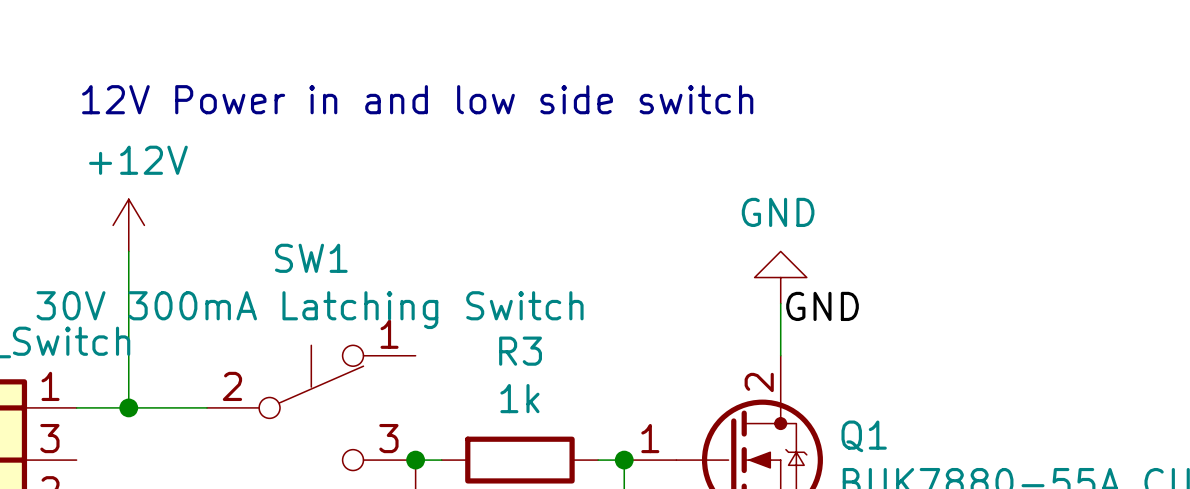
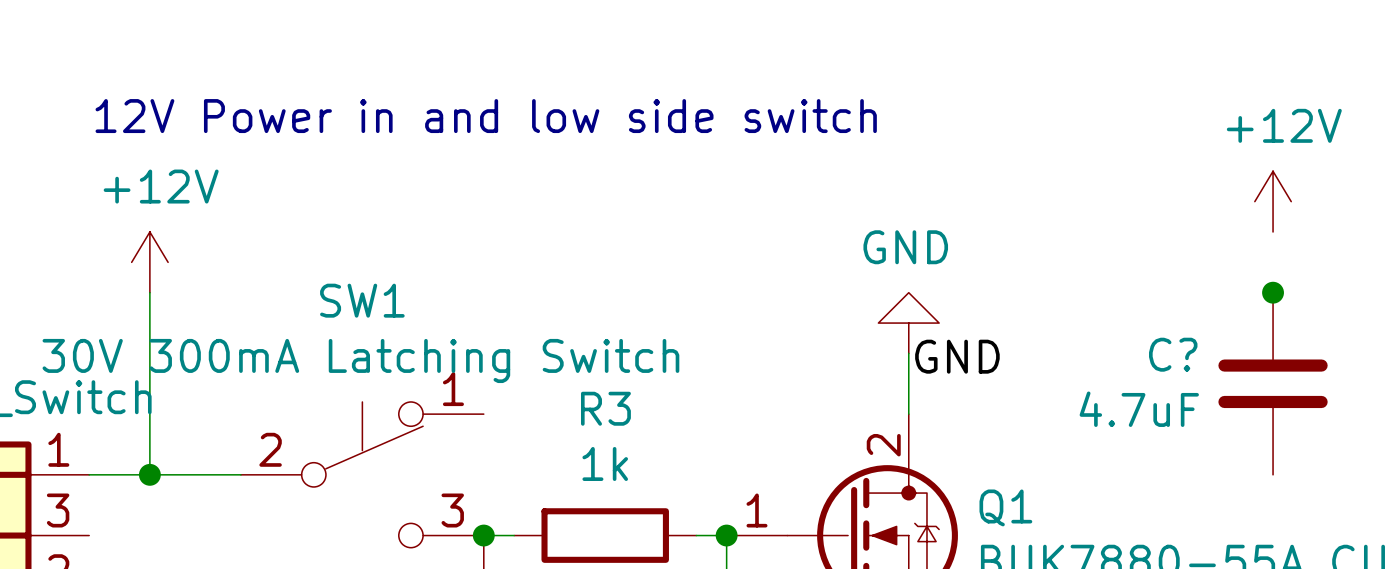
power symbol: none -> +12V (1273, 201)
junction: none -> (1273, 292)
C?: none -> 4.7uF (1273, 383)

